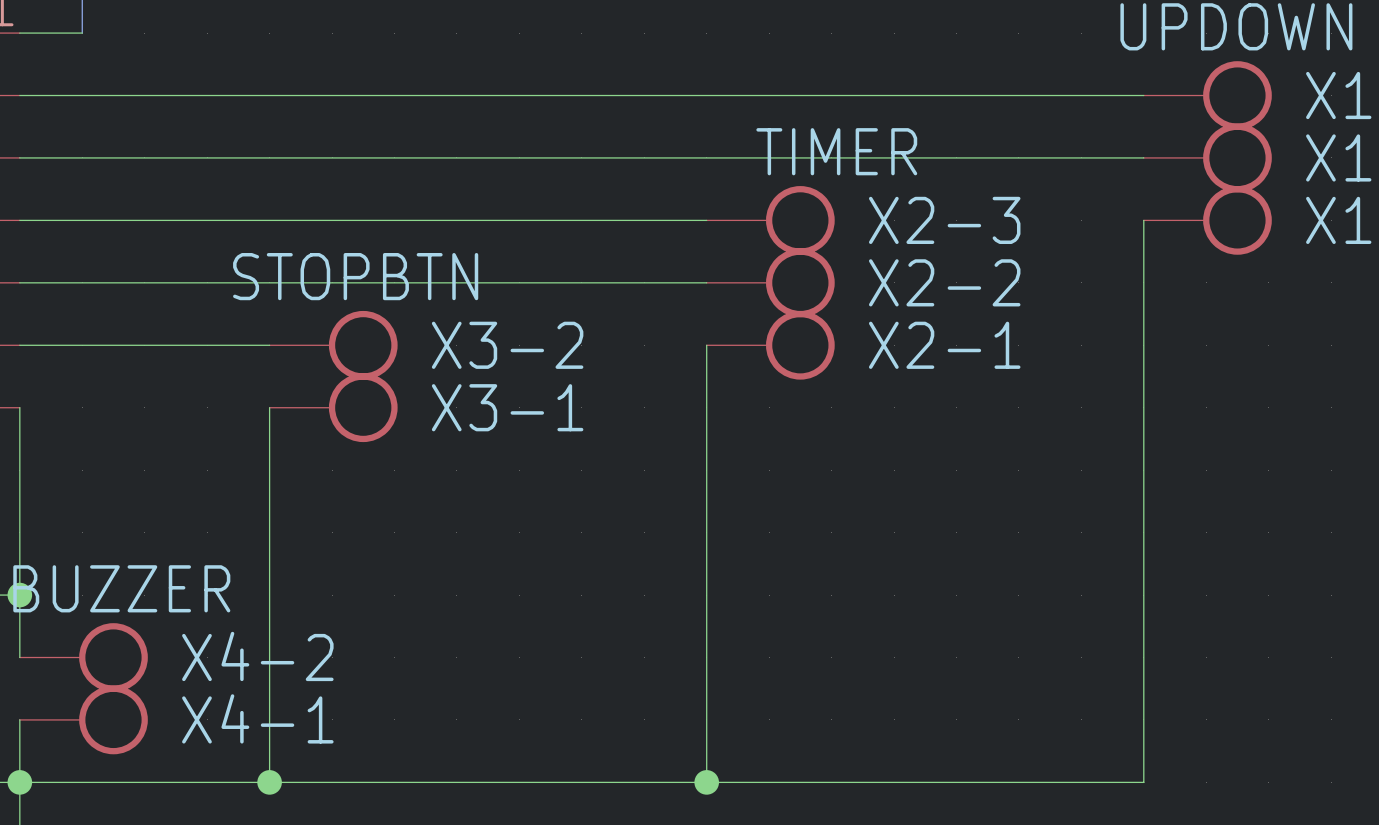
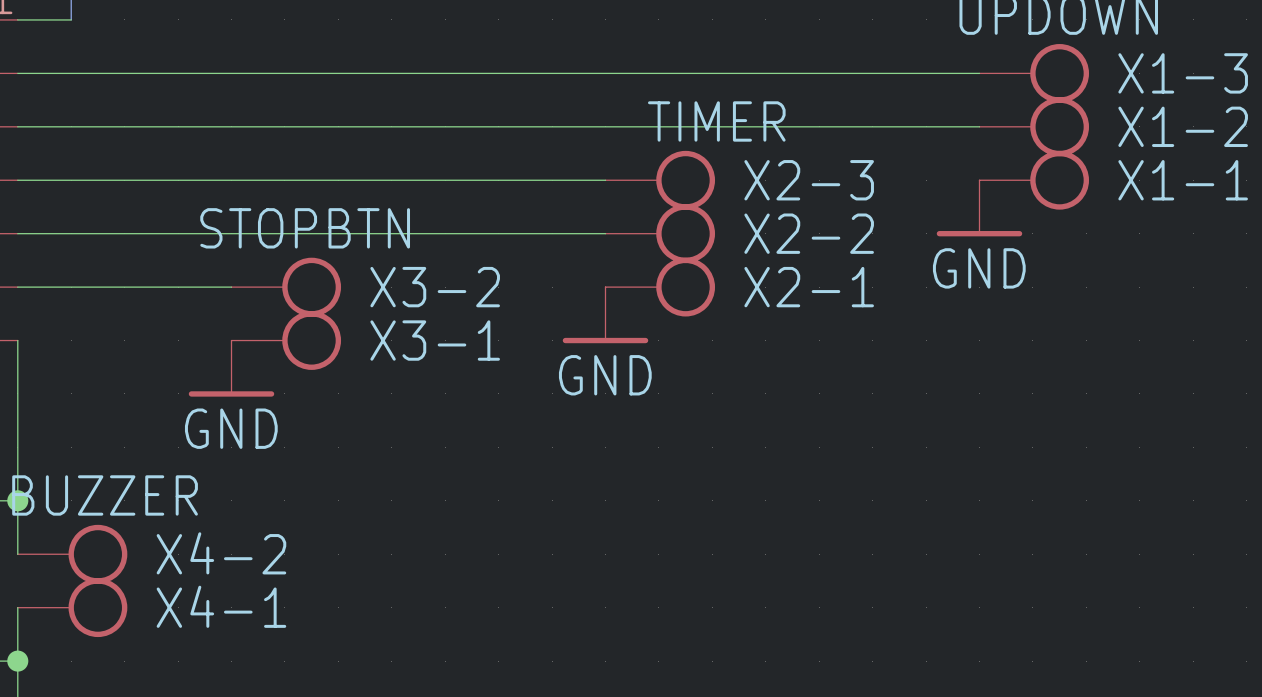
wire: (1143, 220) (1143, 782) (19, 782) -> none
power symbol: none -> GND (979, 208)
wire: (706, 345) (706, 782) -> none
power symbol: none -> GND (605, 315)
wire: (269, 407) (269, 782) -> none
power symbol: none -> GND (231, 368)
junction: (269, 782) -> none
junction: (706, 782) -> none

